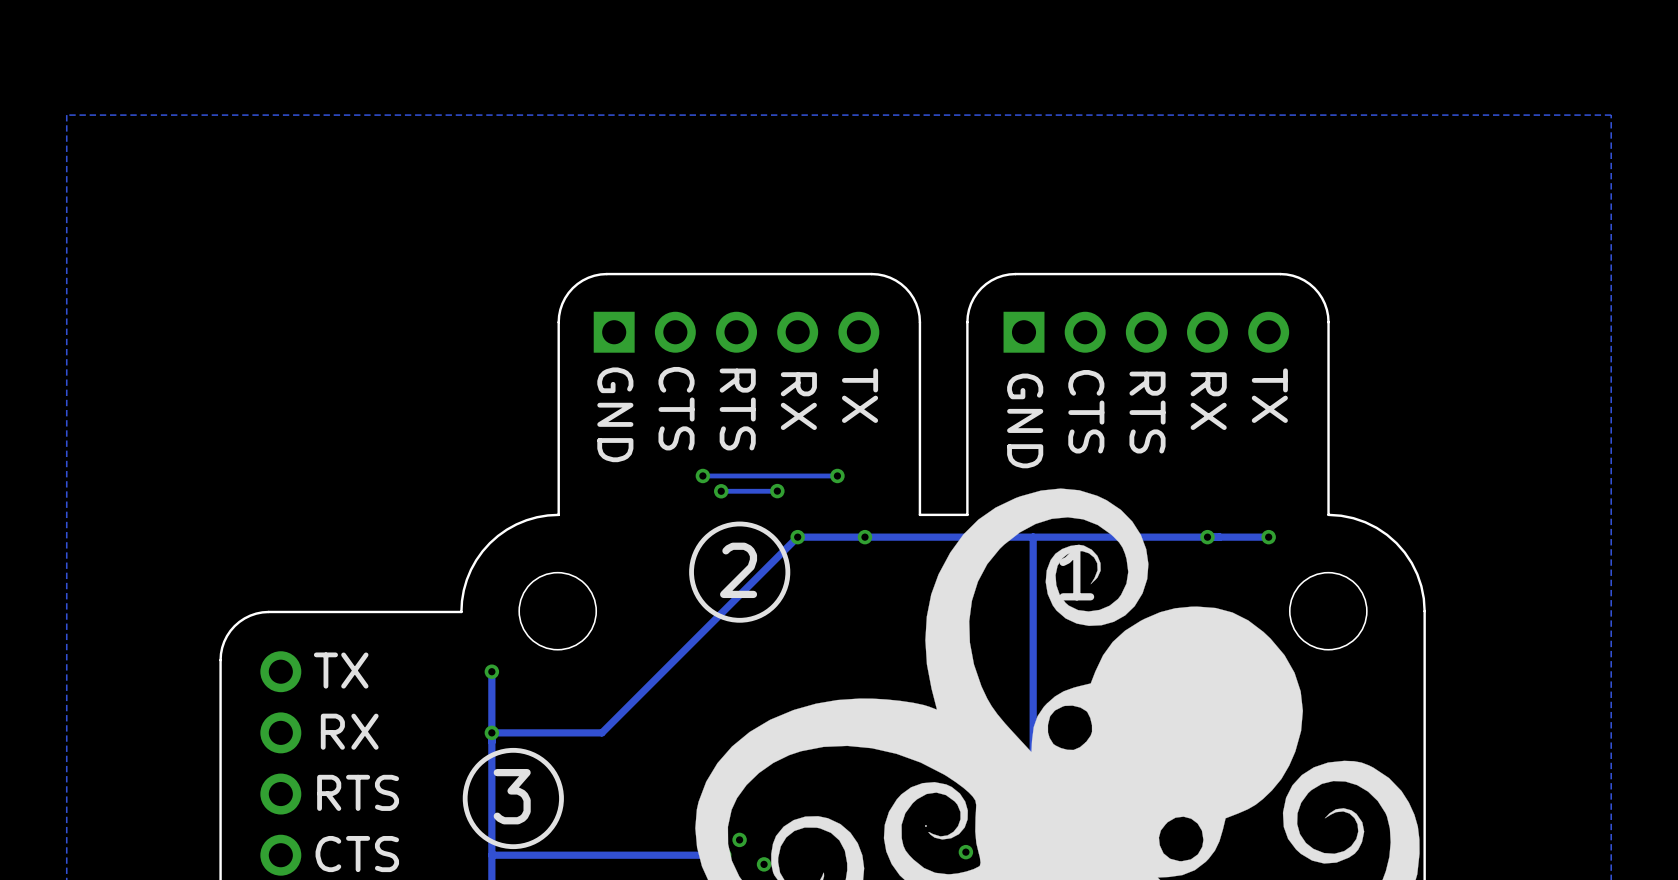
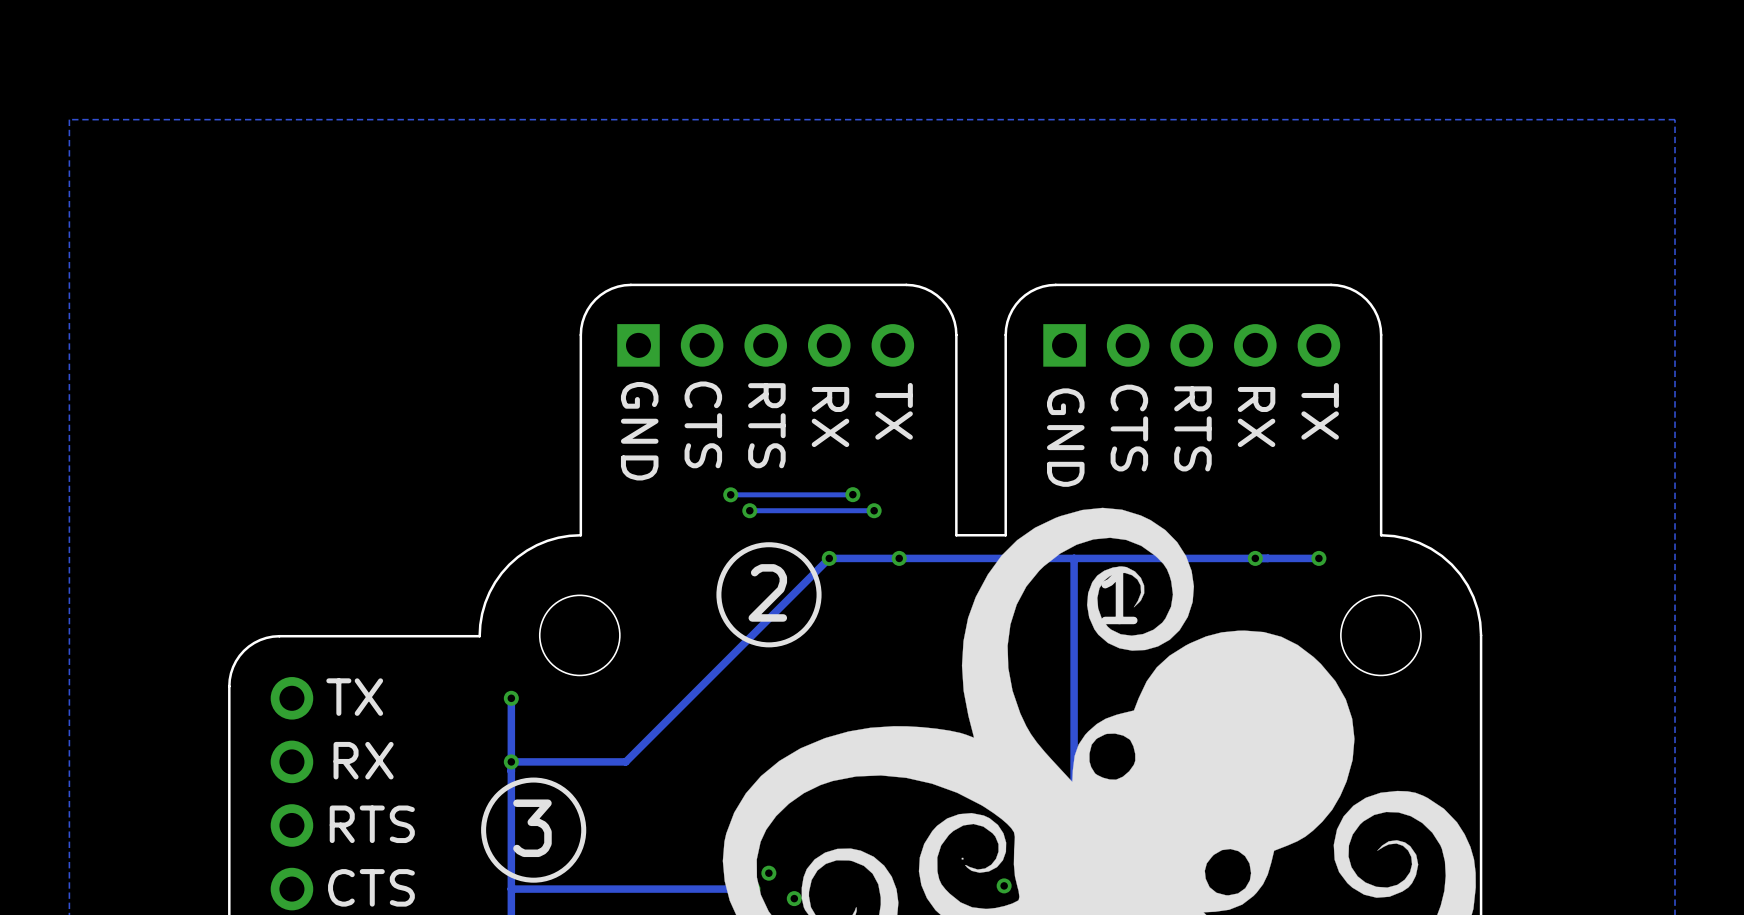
via: none -> (852, 494)
track: (837, 475) (820, 475) -> none
via: (837, 475) -> none
via: (777, 491) -> none
track: none -> (874, 510) (807, 510)
via: none -> (874, 510)

